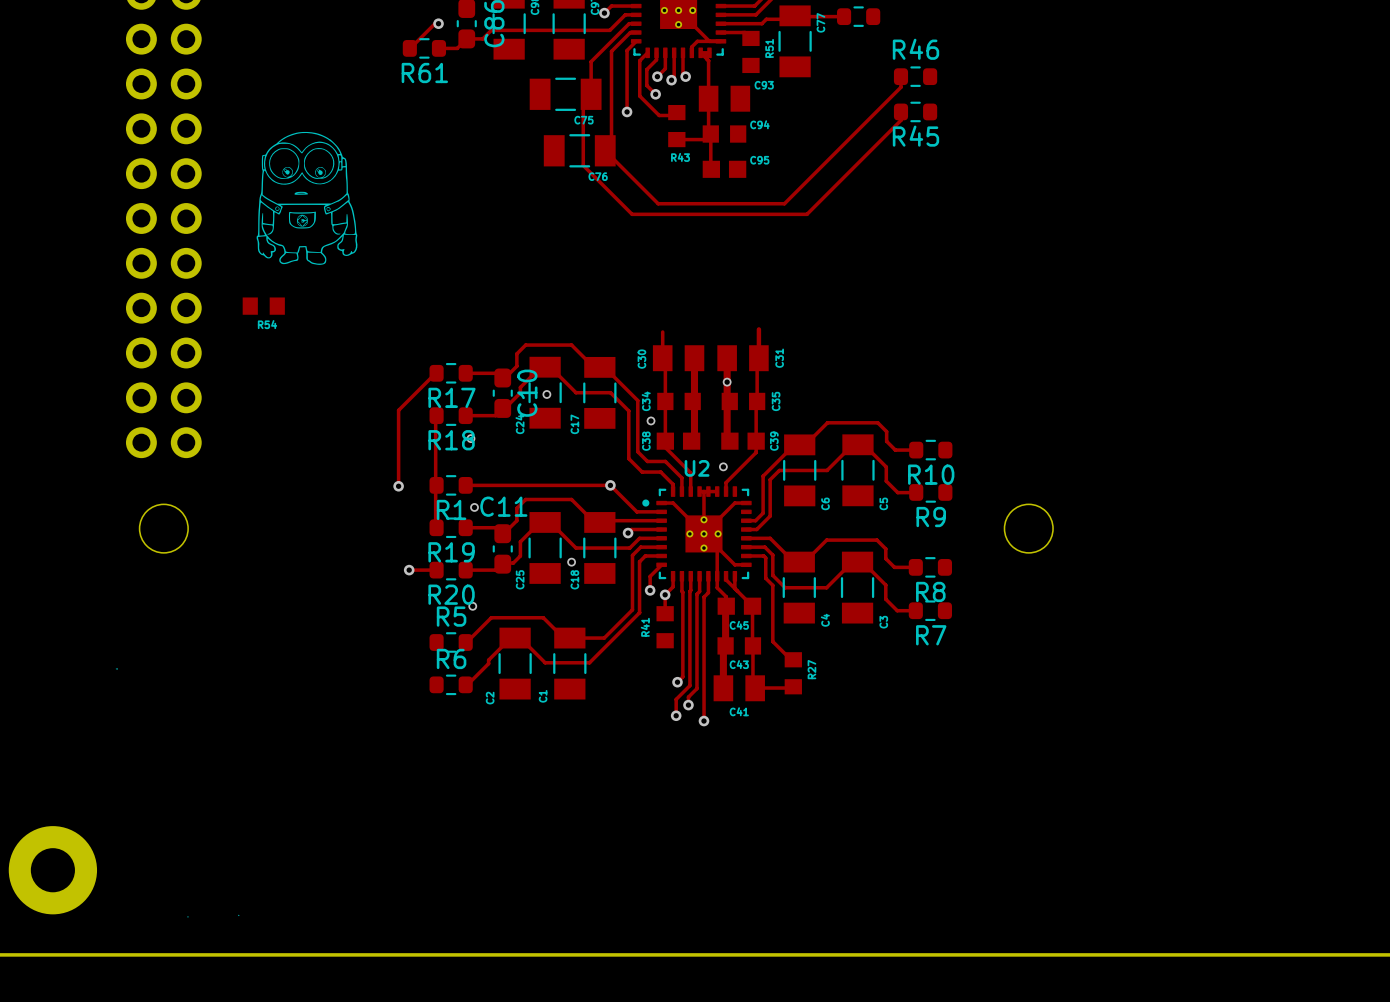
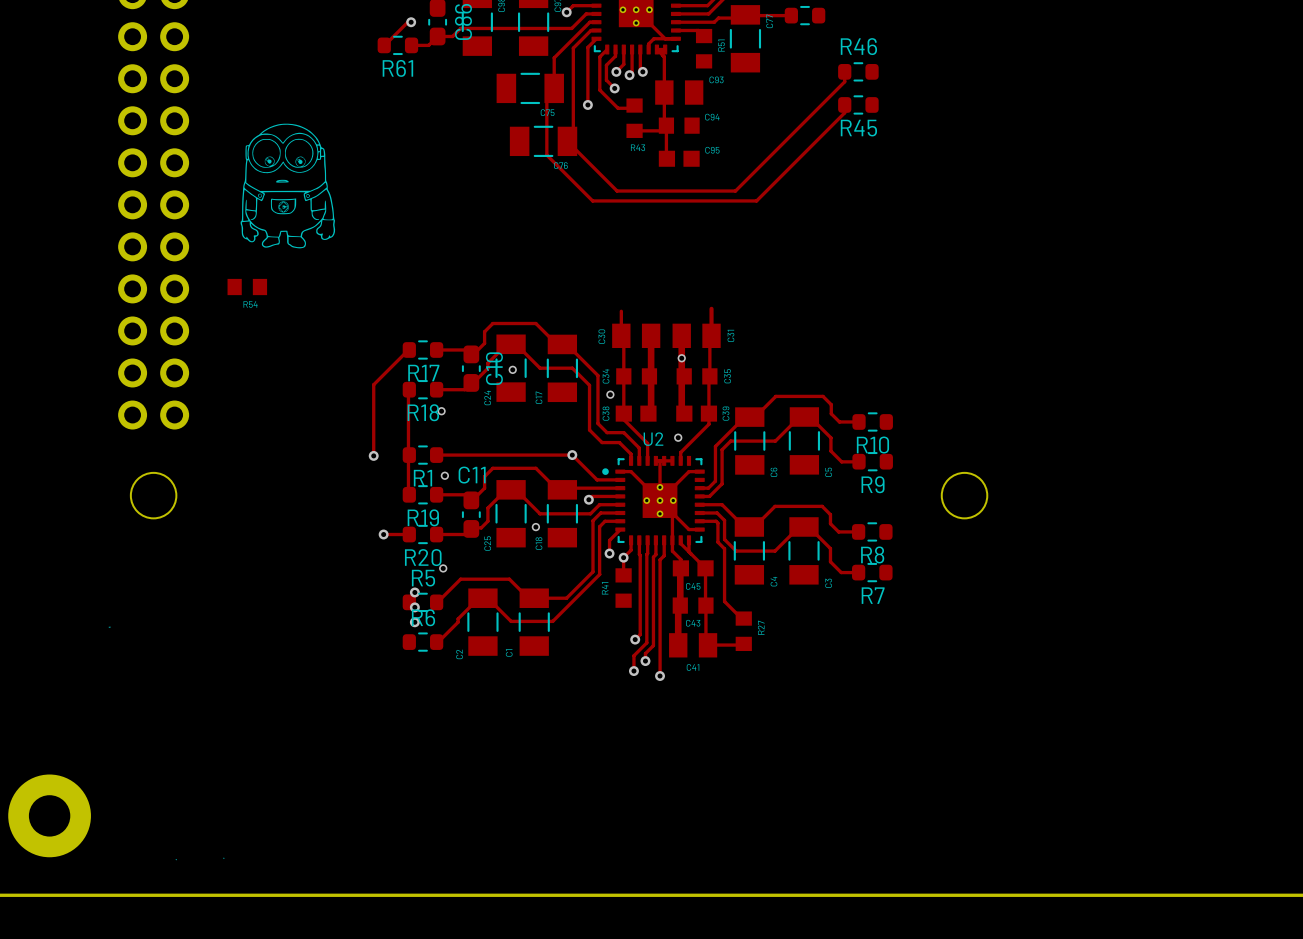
via: none -> (414, 592)
via: none -> (414, 607)
via: none -> (414, 622)

